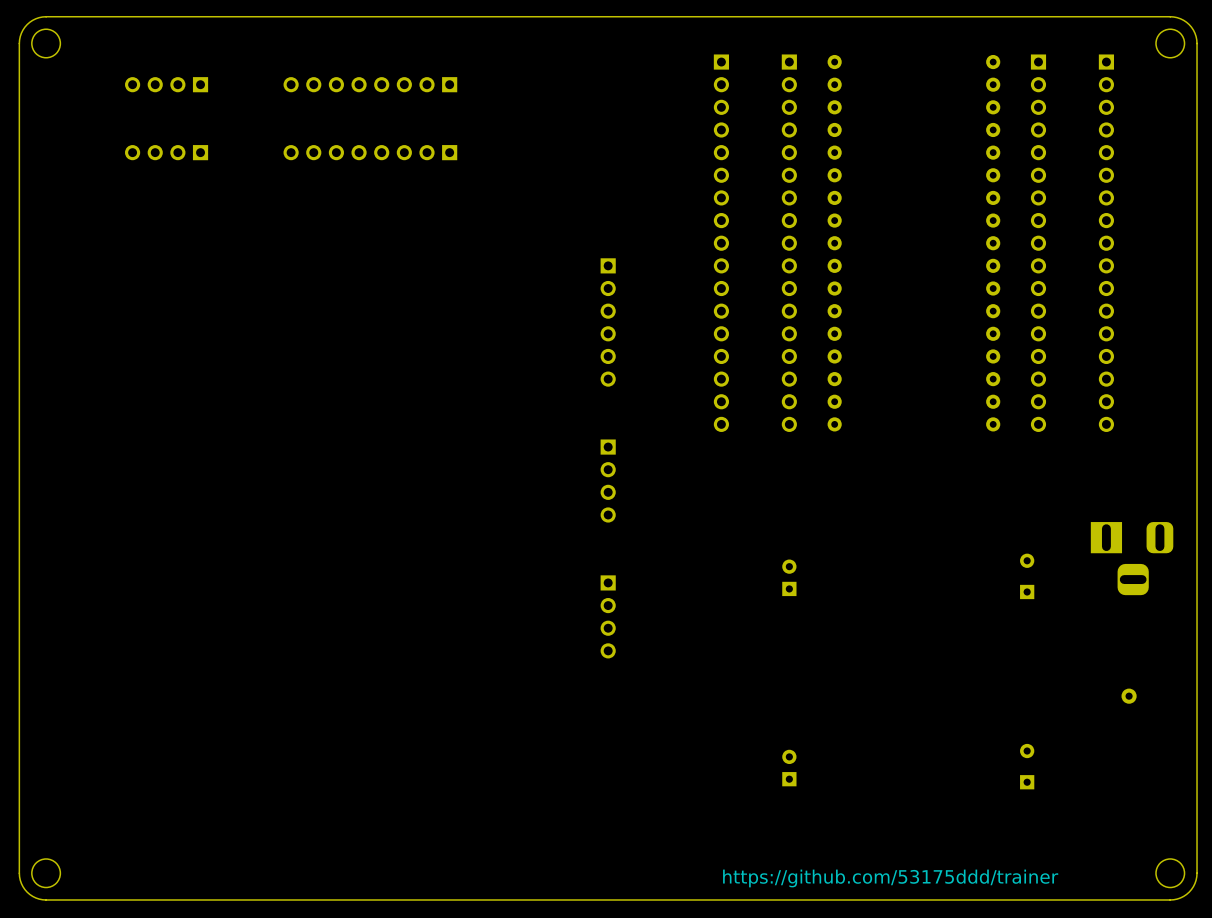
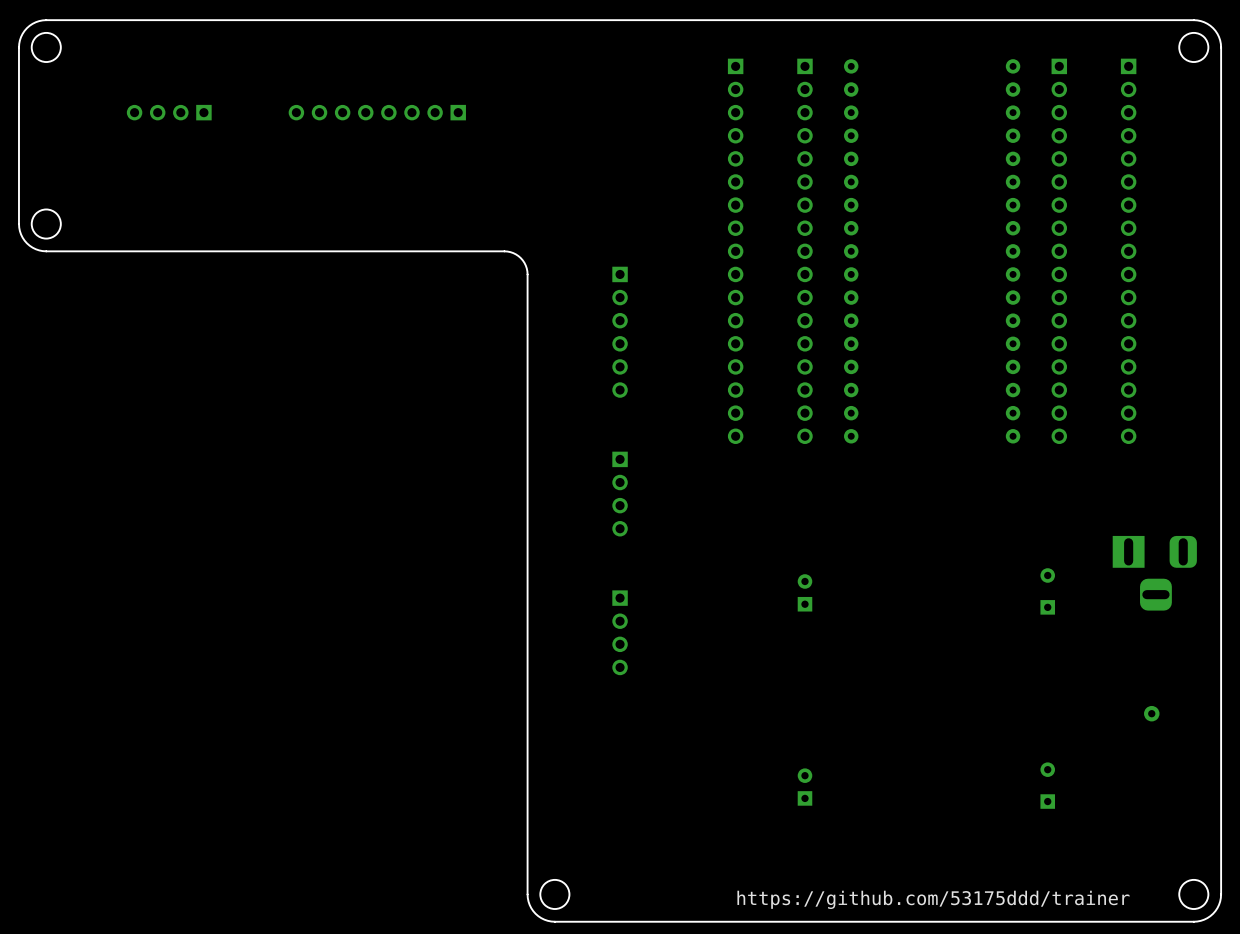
part: (166, 84) -> none
part: (370, 84) -> none
part: none -> (169, 112)
part: none -> (377, 112)
part: (166, 152) -> none
part: (370, 152) -> none
round board edge: none -> [31, 209, 62, 239]
board edge: (19, 216) (19, 873) (24, 889) (32, 896) (46, 899) (544, 899) -> (18, 224) (21, 234) (26, 243) (42, 251) (504, 251) (513, 253) (522, 260) (527, 274) (527, 894) (529, 904) (535, 913) (544, 919) (554, 921)
round board edge: [31, 858, 61, 888] -> none
round board edge: none -> [540, 879, 570, 910]

